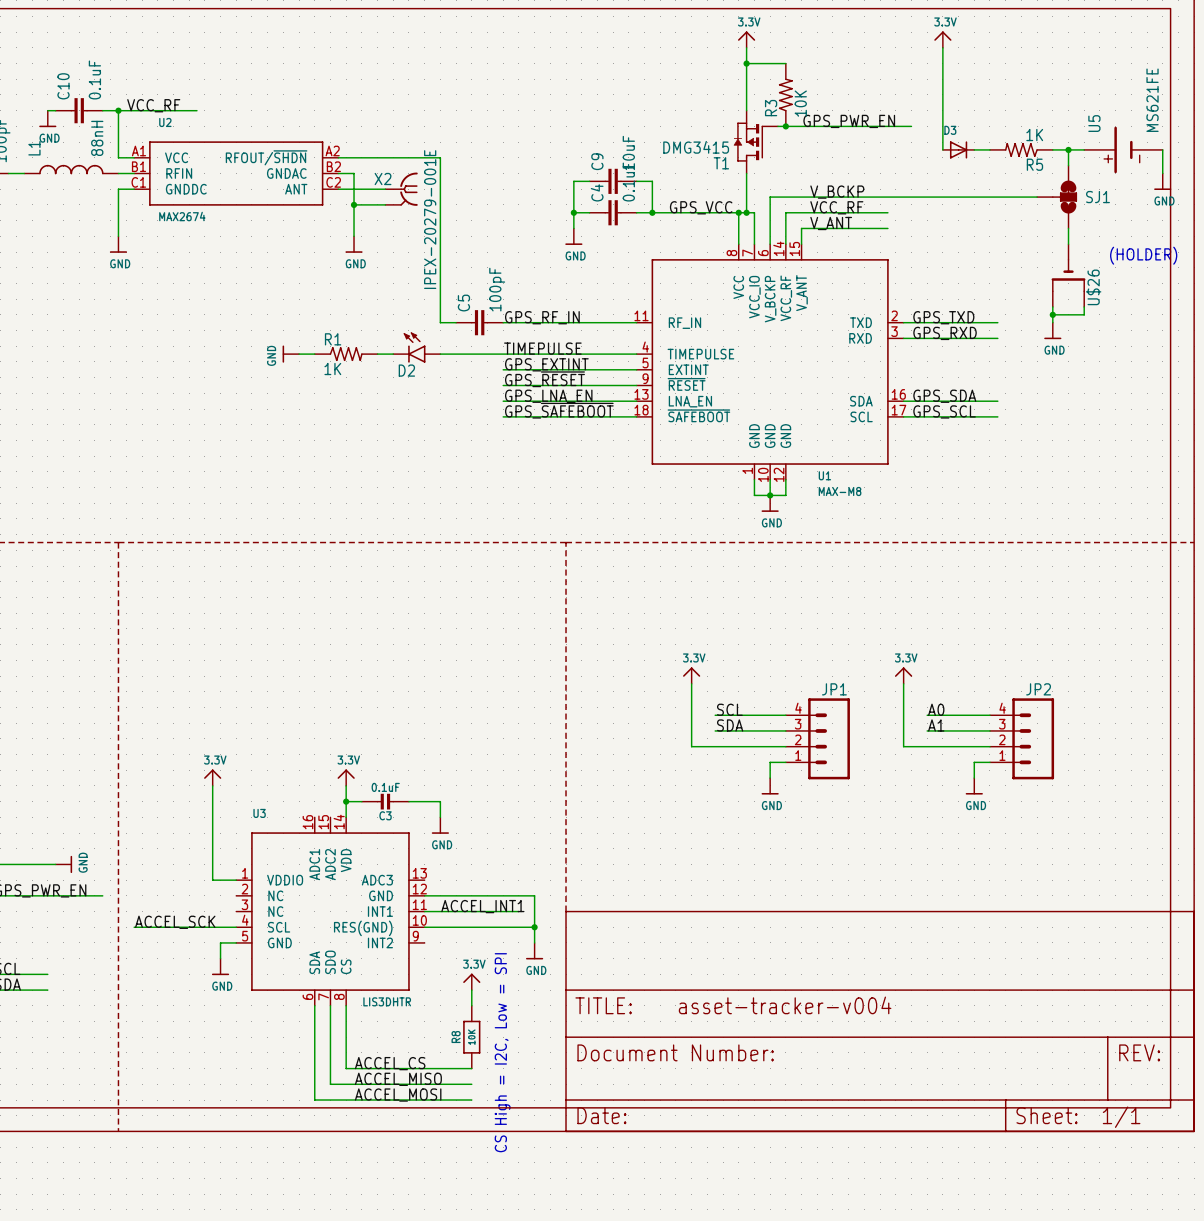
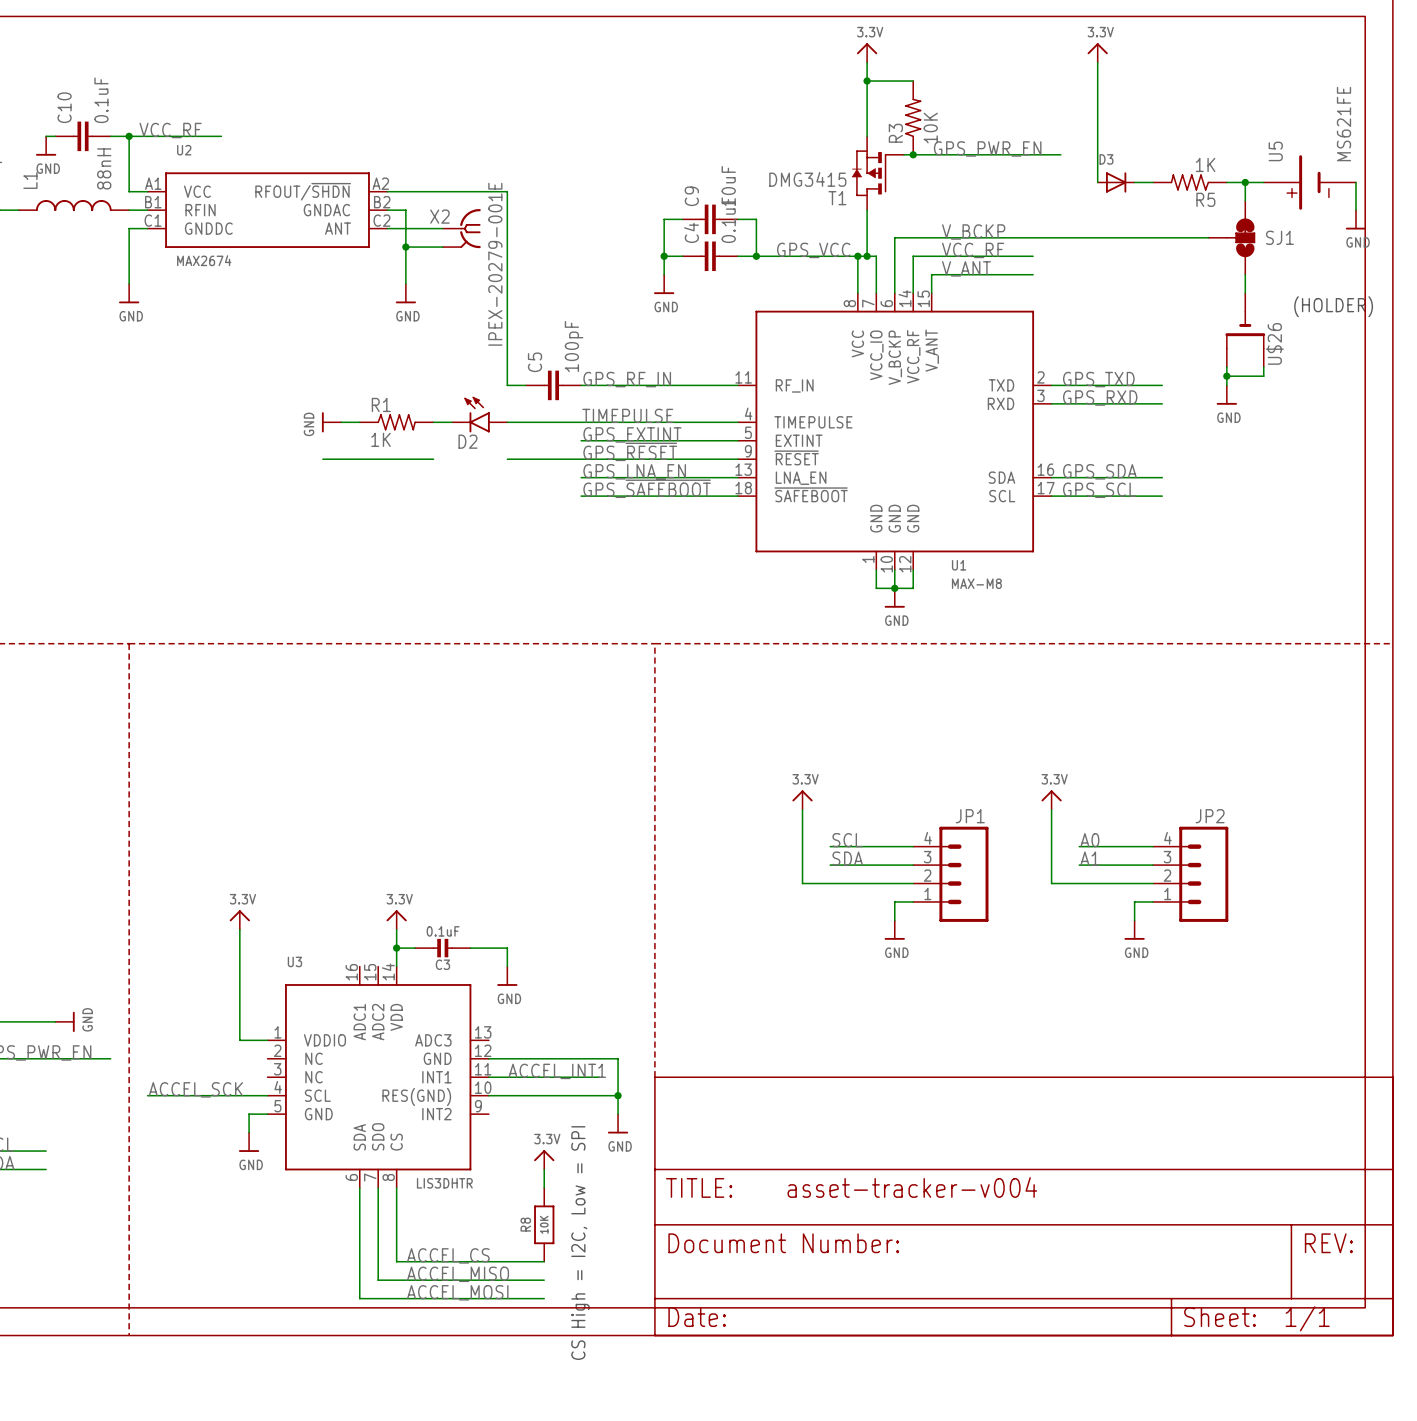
wire: none -> (322, 459) (433, 459)
wire: none -> (507, 459) (581, 459)

